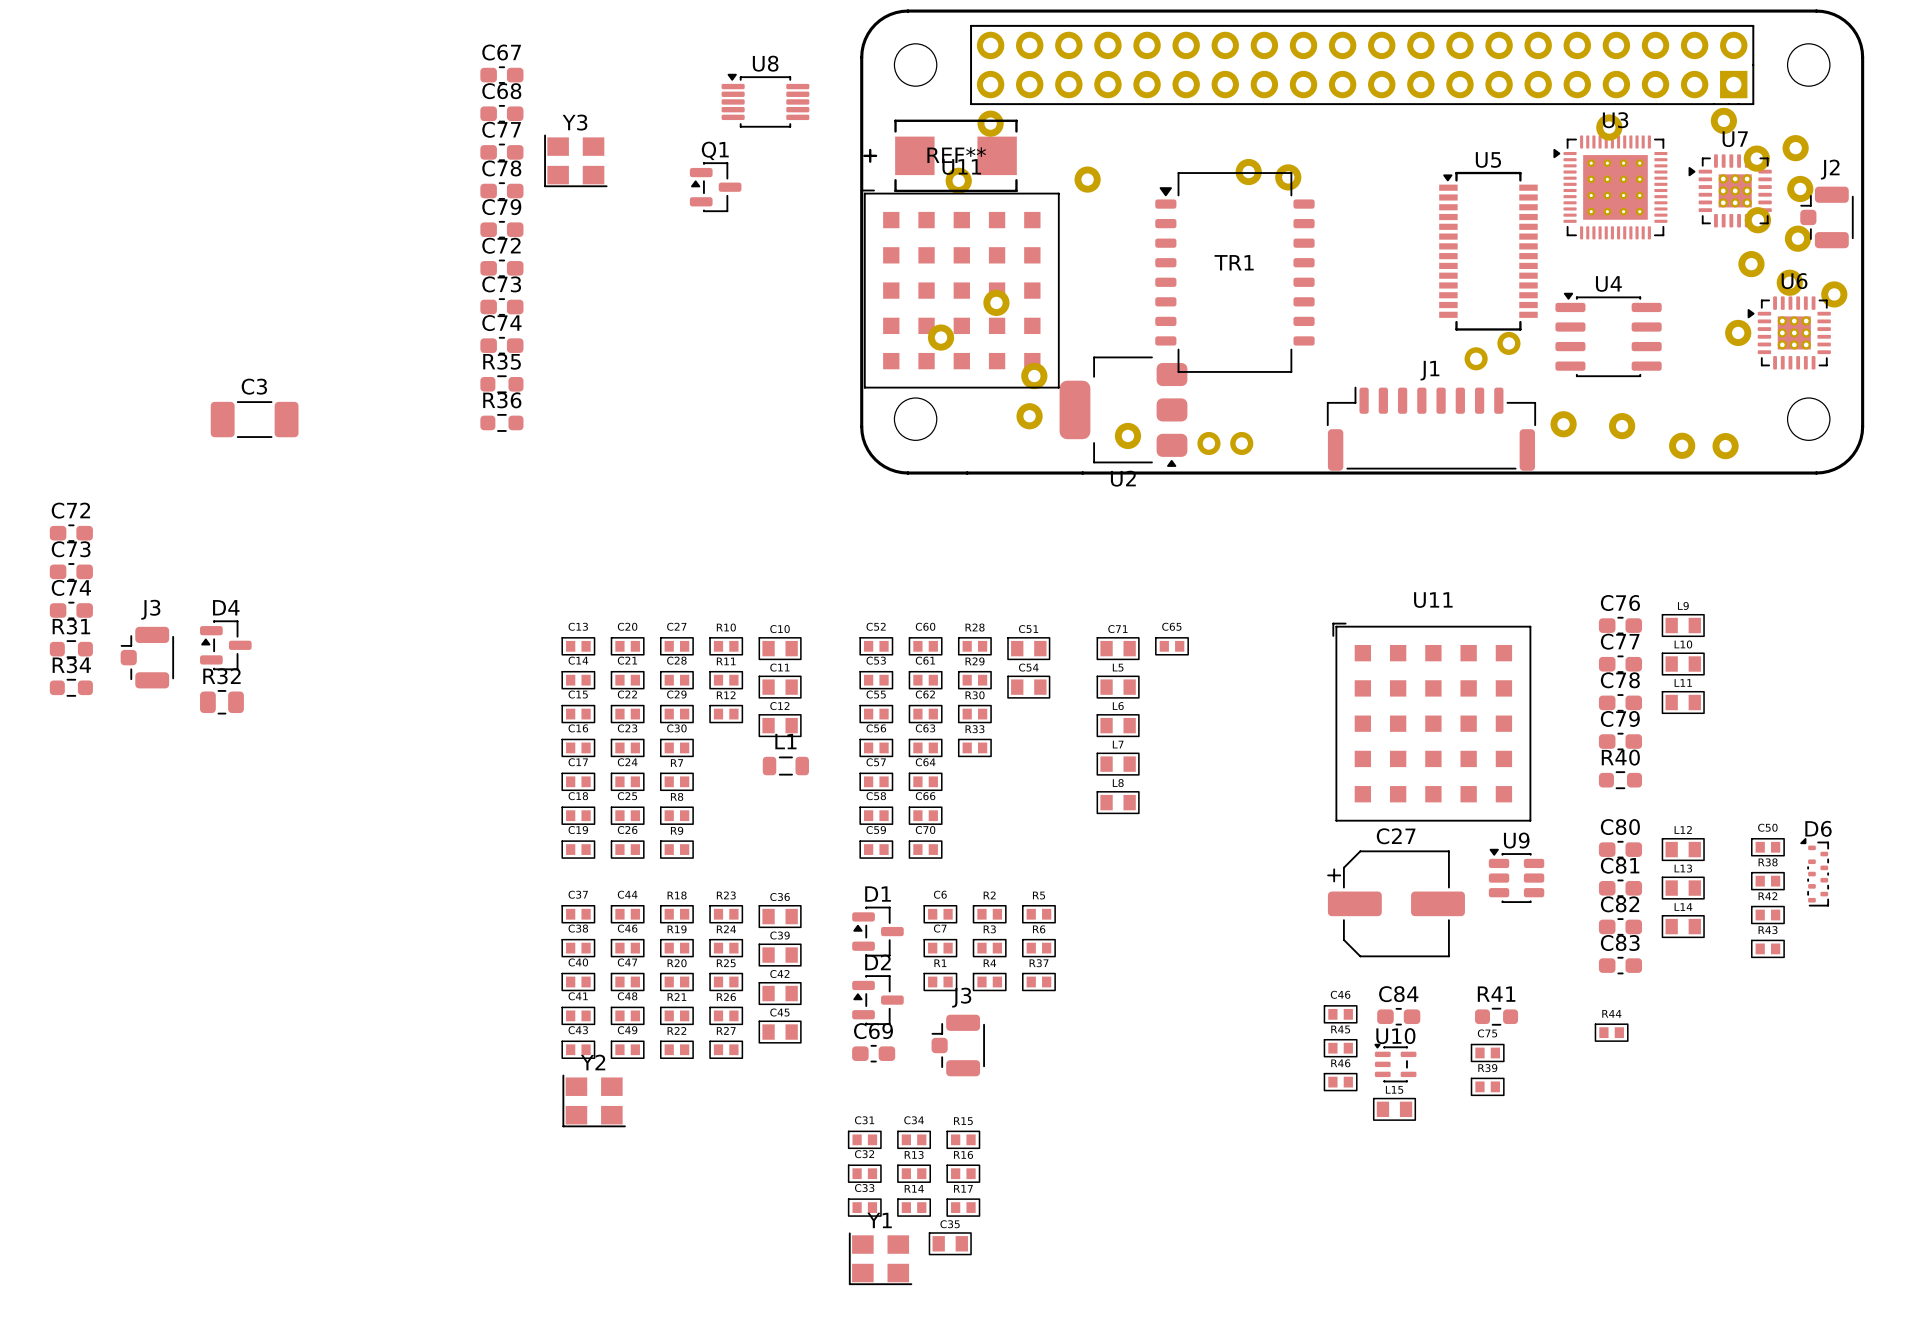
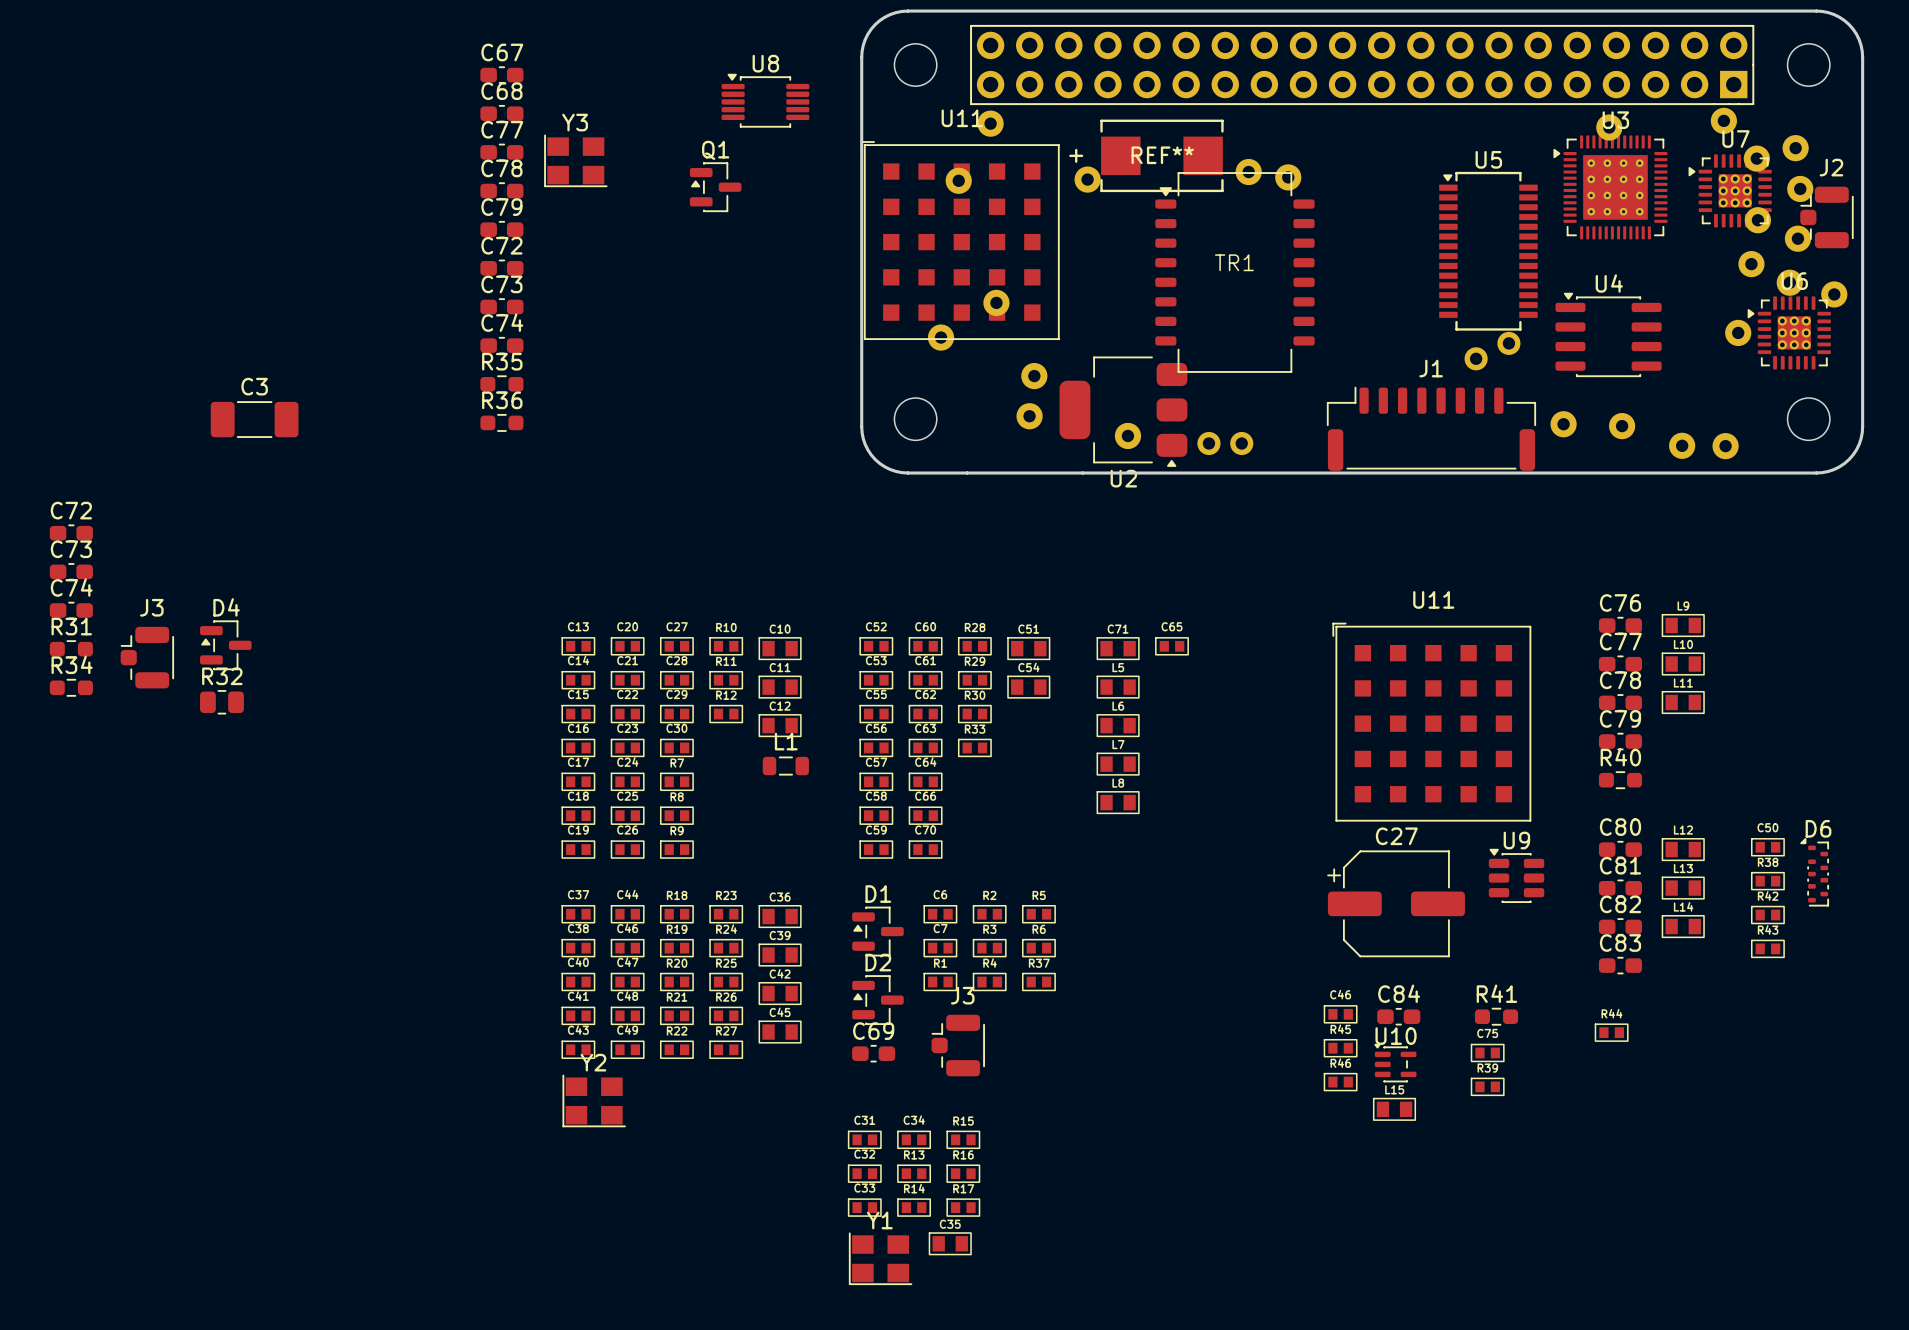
REF** position: (940, 155) -> (1146, 155)
U11 position: (960, 289) -> (960, 240)

